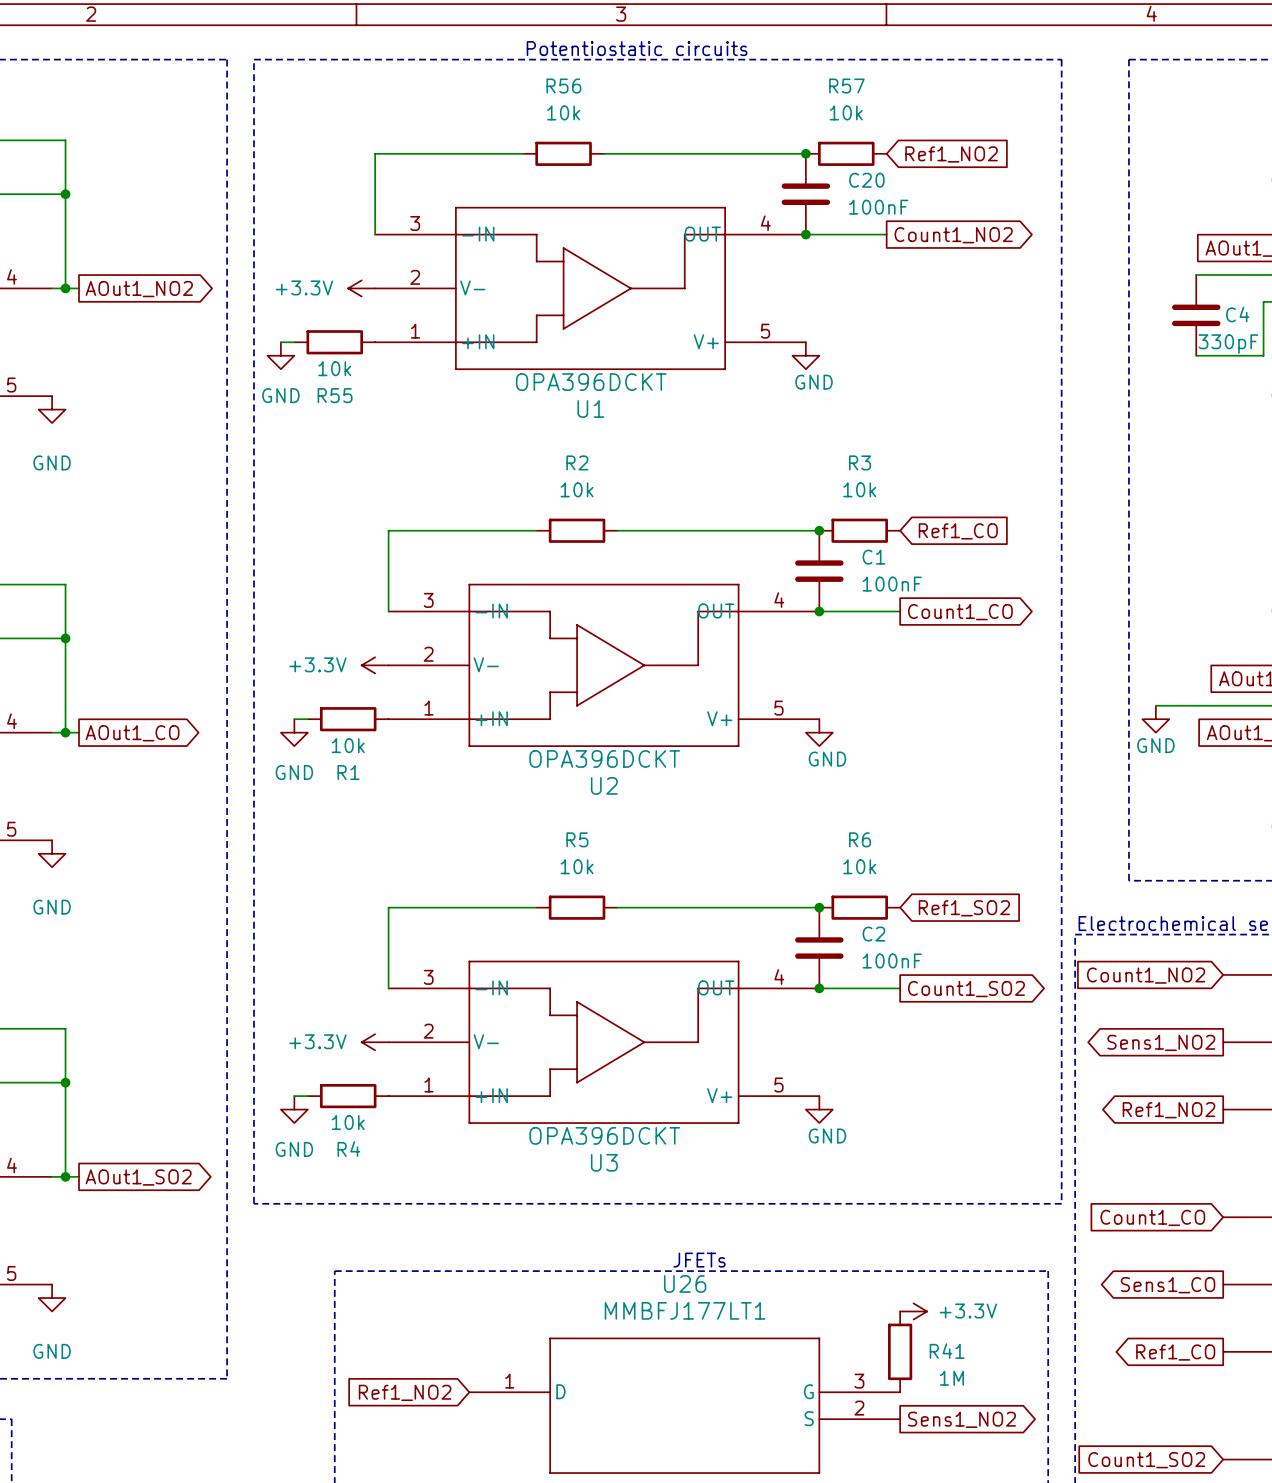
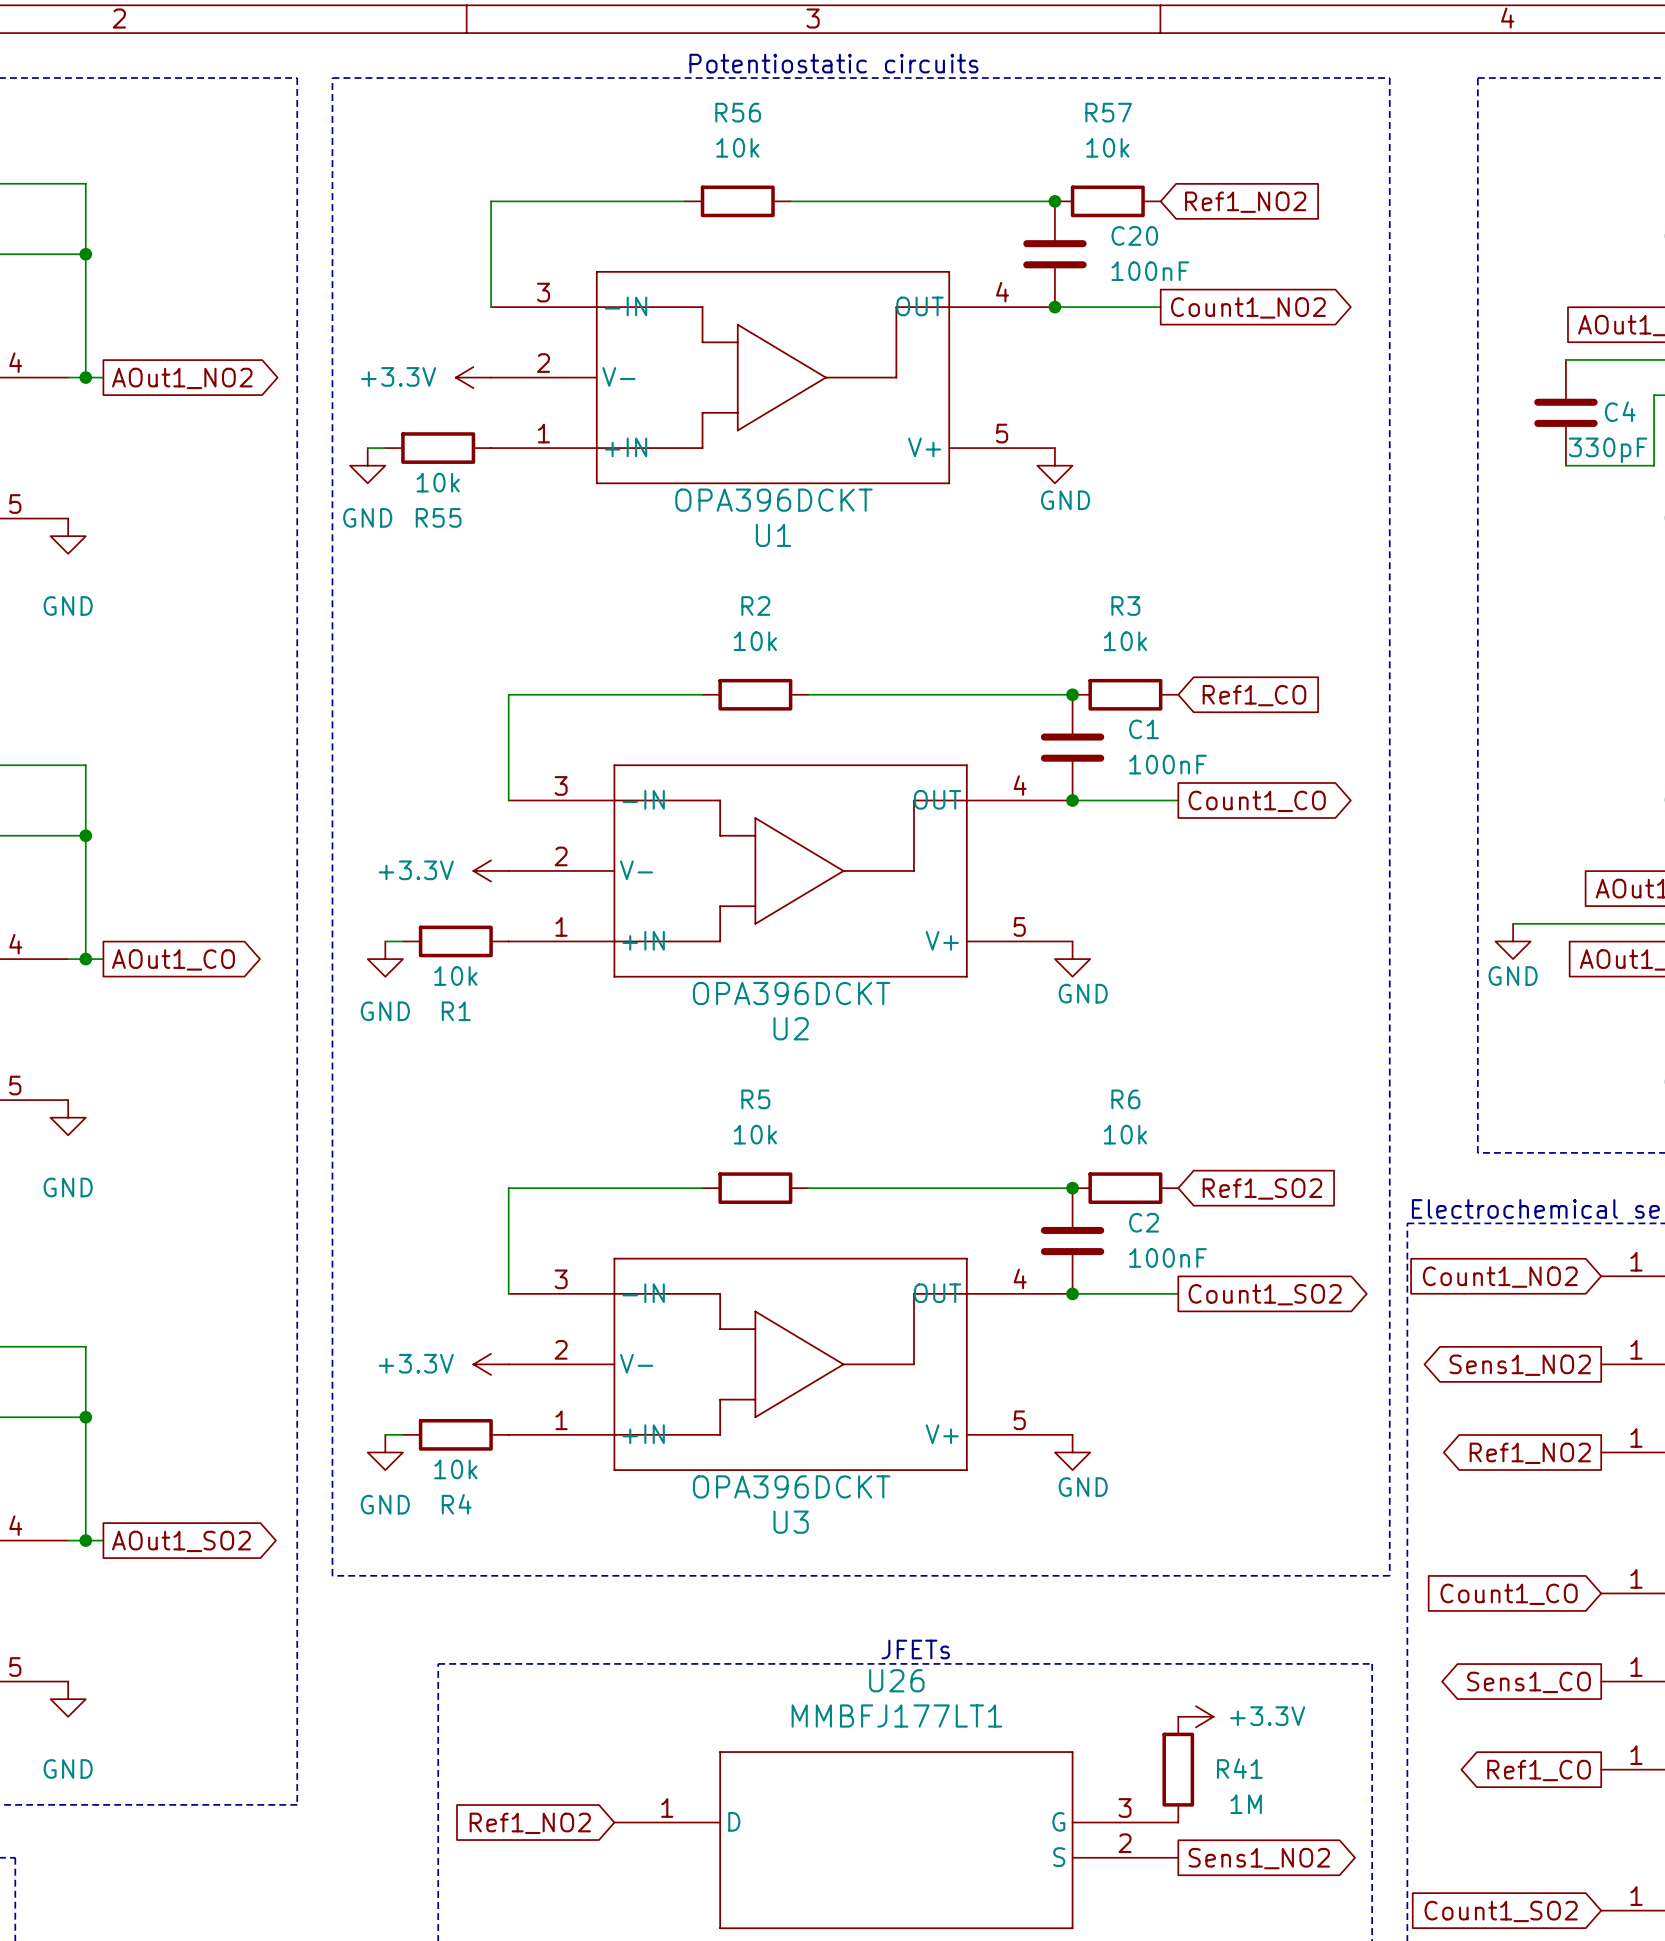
part pin number: none -> 1 (1636, 1261)
part pin number: none -> 1 (1636, 1349)
part pin number: none -> 1 (1636, 1437)
part pin number: none -> 1 (1636, 1578)
part pin number: none -> 1 (1636, 1667)
part pin number: none -> 1 (1636, 1755)
part pin number: none -> 1 (1636, 1896)

